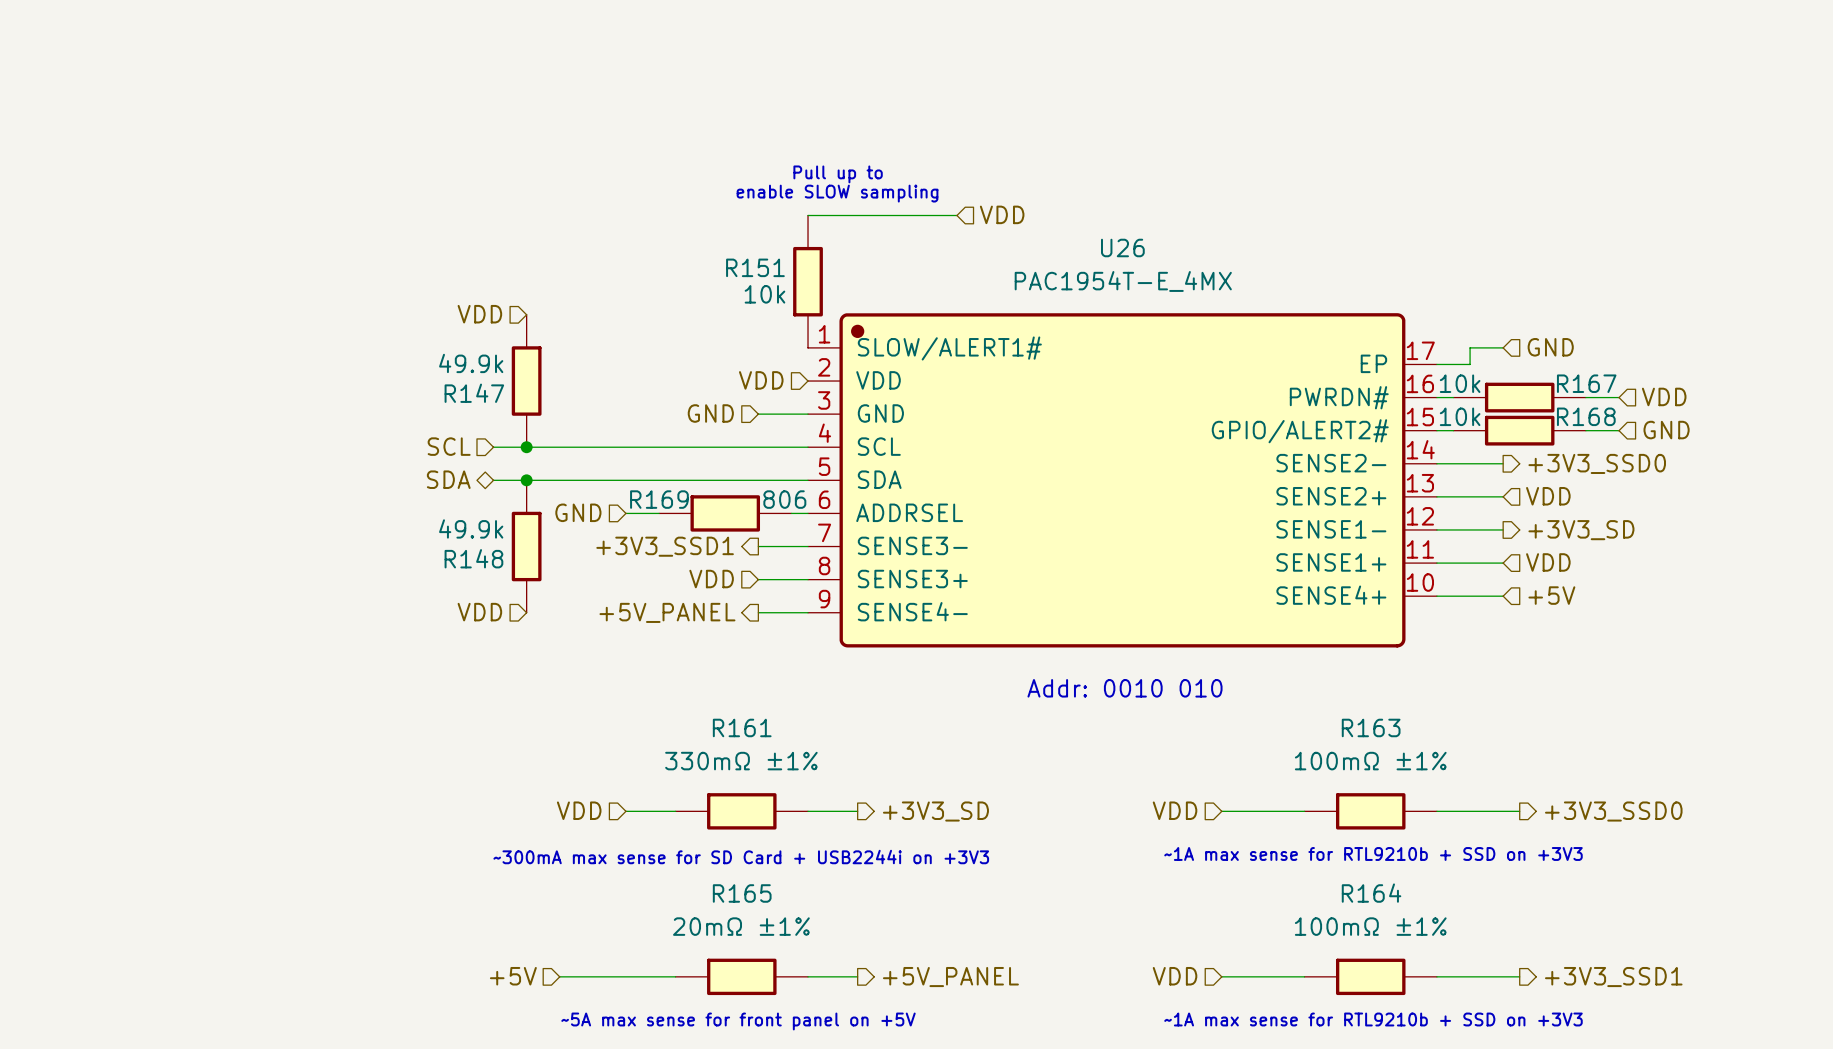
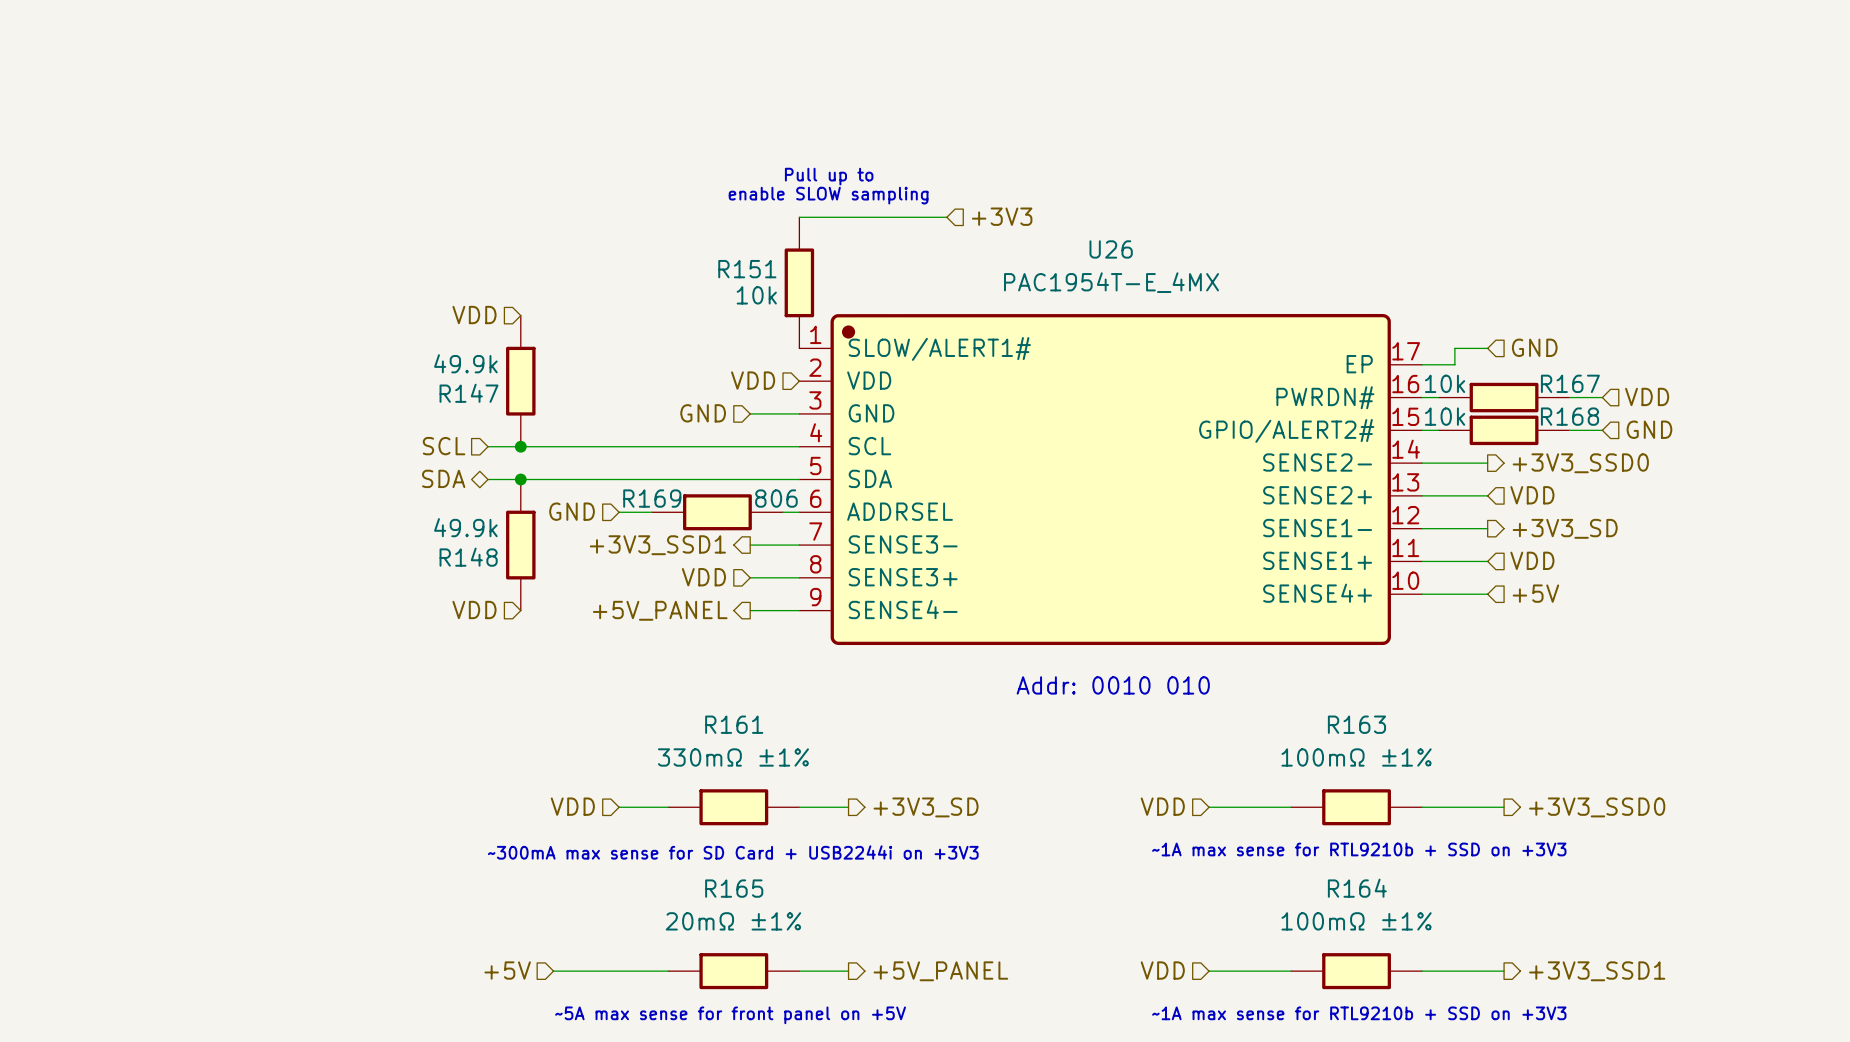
hierarchical label: VDD (1002, 214) -> +3V3 (1002, 216)

